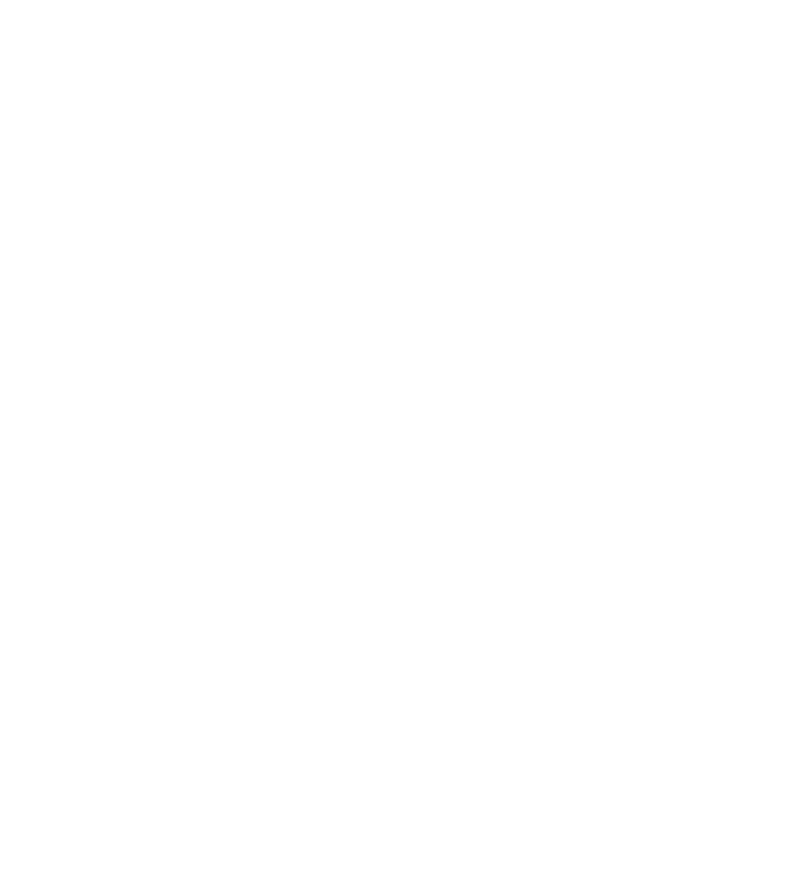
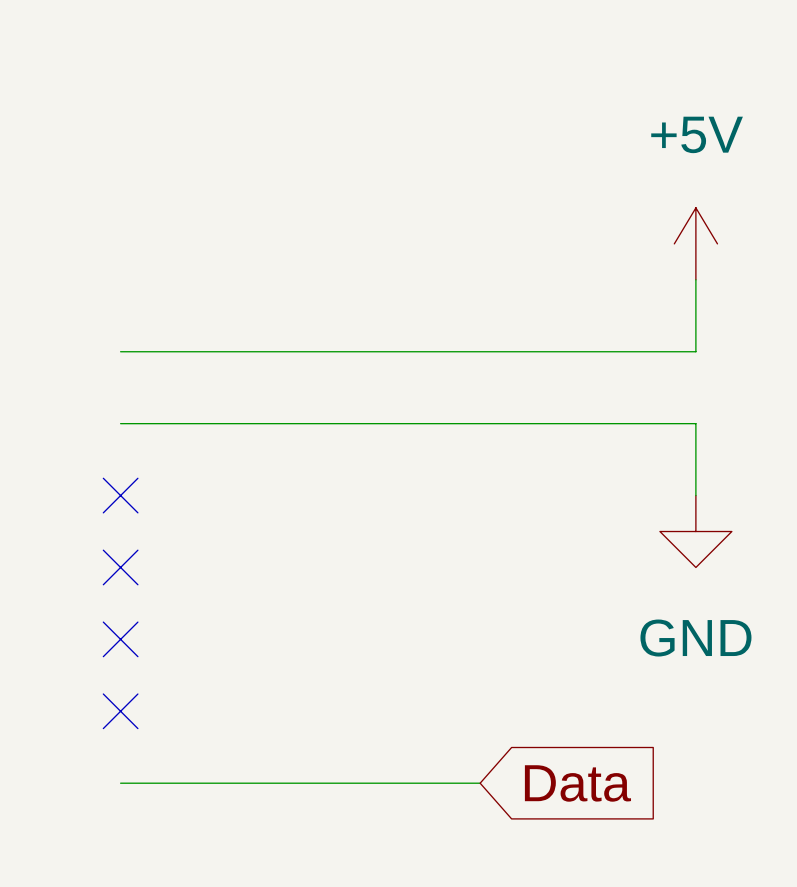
power symbol: none -> +5V (695, 243)
wire: none -> (695, 279) (695, 351) (120, 351)
wire: none -> (120, 423) (695, 423) (695, 495)
no-connect mark: none -> (120, 495)
power symbol: none -> GND (695, 531)
no-connect mark: none -> (120, 567)
no-connect mark: none -> (120, 639)
no-connect mark: none -> (120, 711)
wire: none -> (120, 783) (480, 783)
global label: none -> Data (577, 783)

